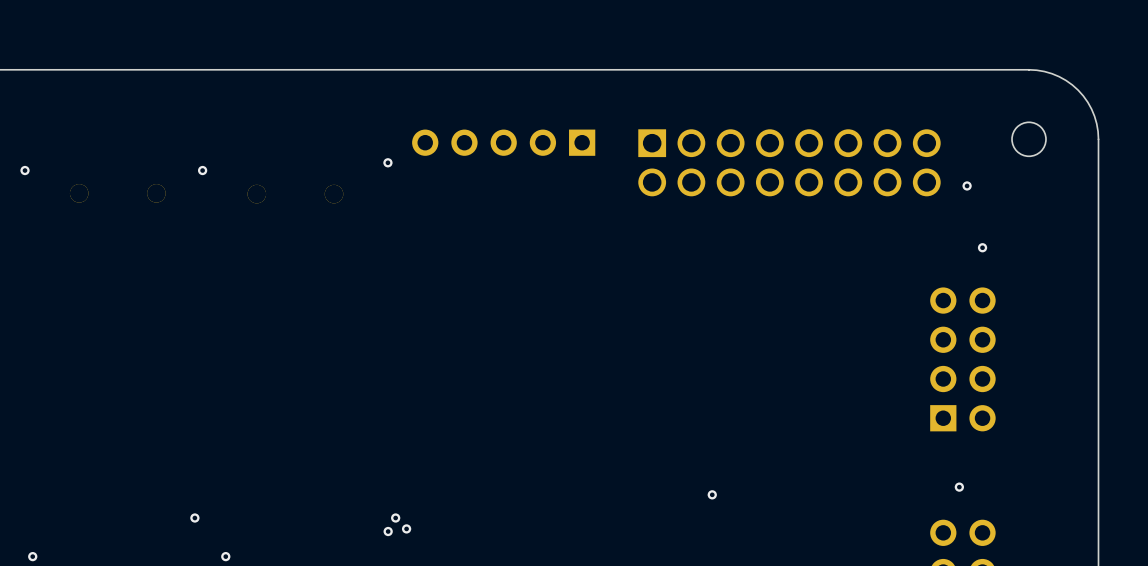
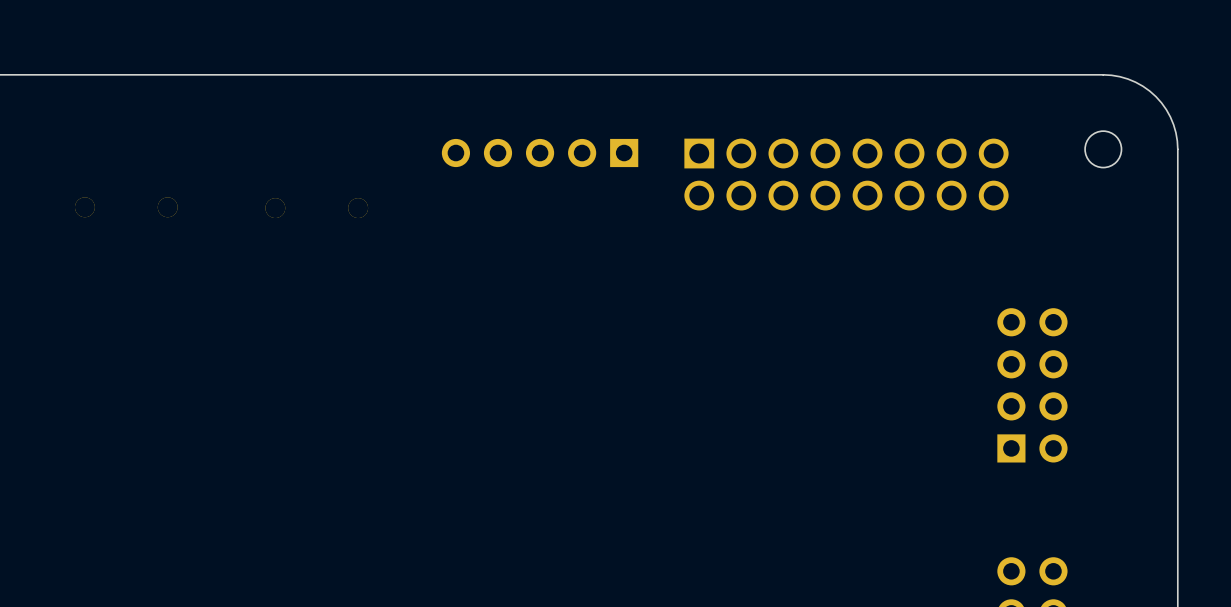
via: (387, 162) -> none
via: (25, 170) -> none
via: (202, 170) -> none
via: (967, 185) -> none
via: (982, 247) -> none
via: (959, 487) -> none
via: (712, 494) -> none
via: (194, 518) -> none
via: (395, 518) -> none
via: (406, 528) -> none
via: (388, 531) -> none
via: (32, 556) -> none
via: (225, 556) -> none

